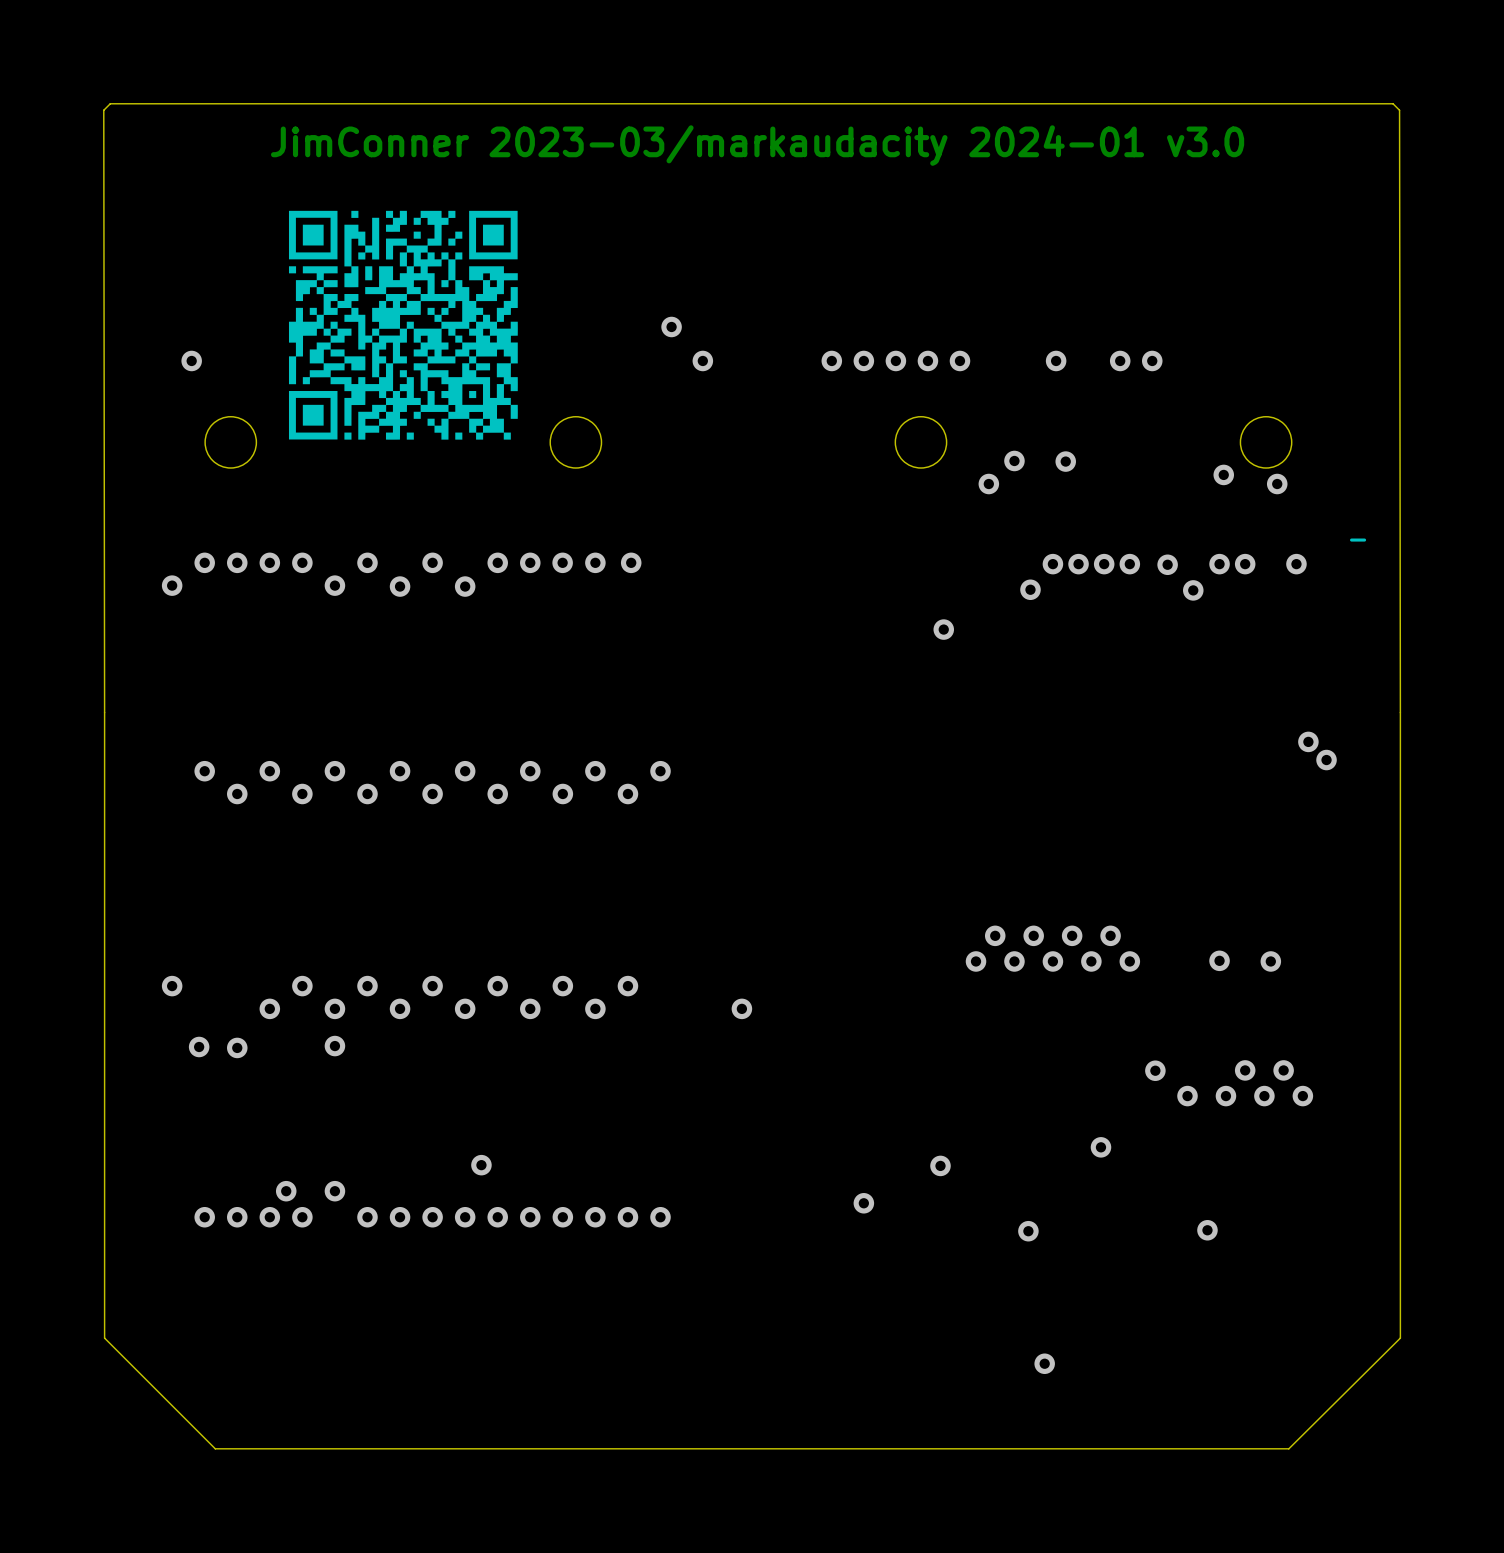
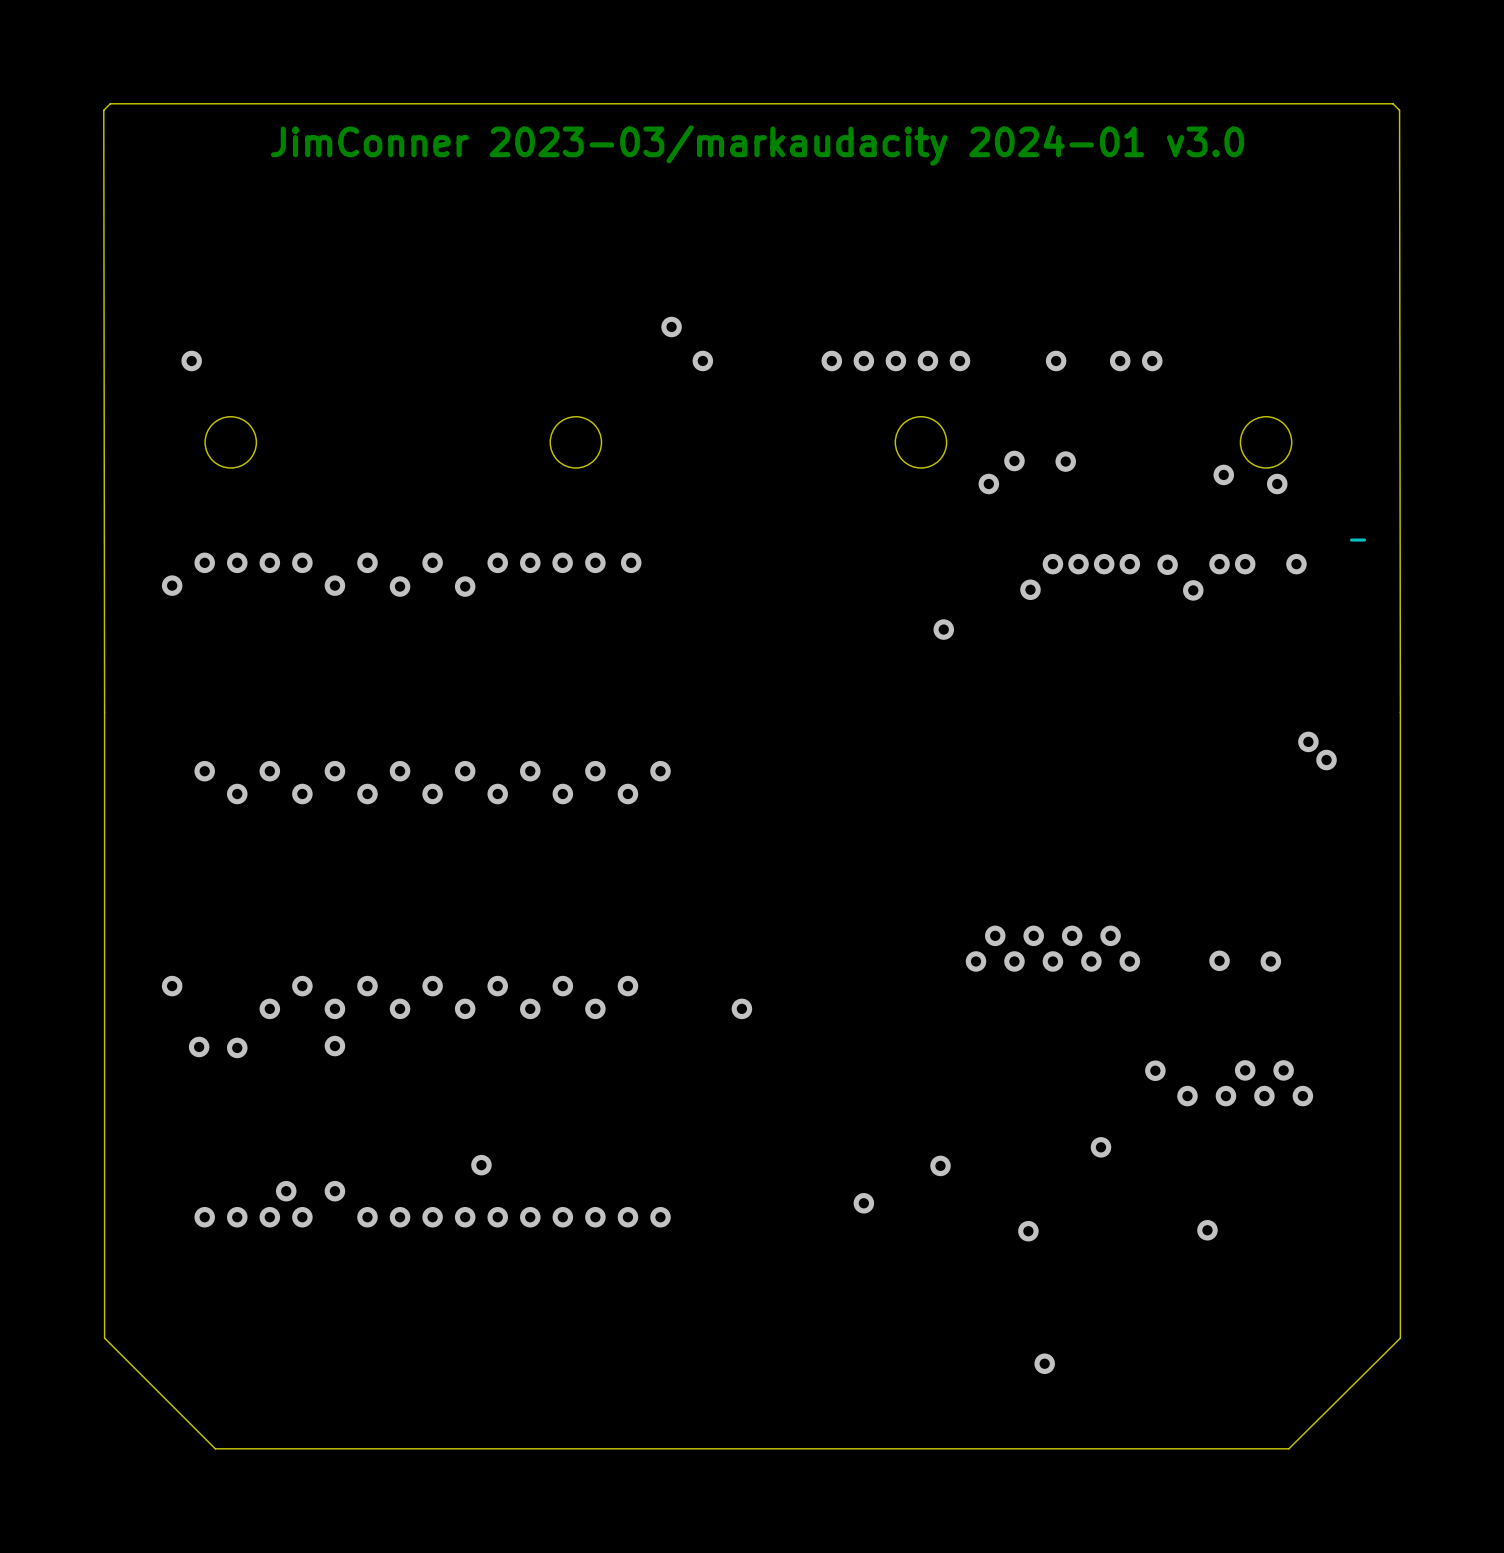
drawing: [288, 210, 518, 440] -> none

